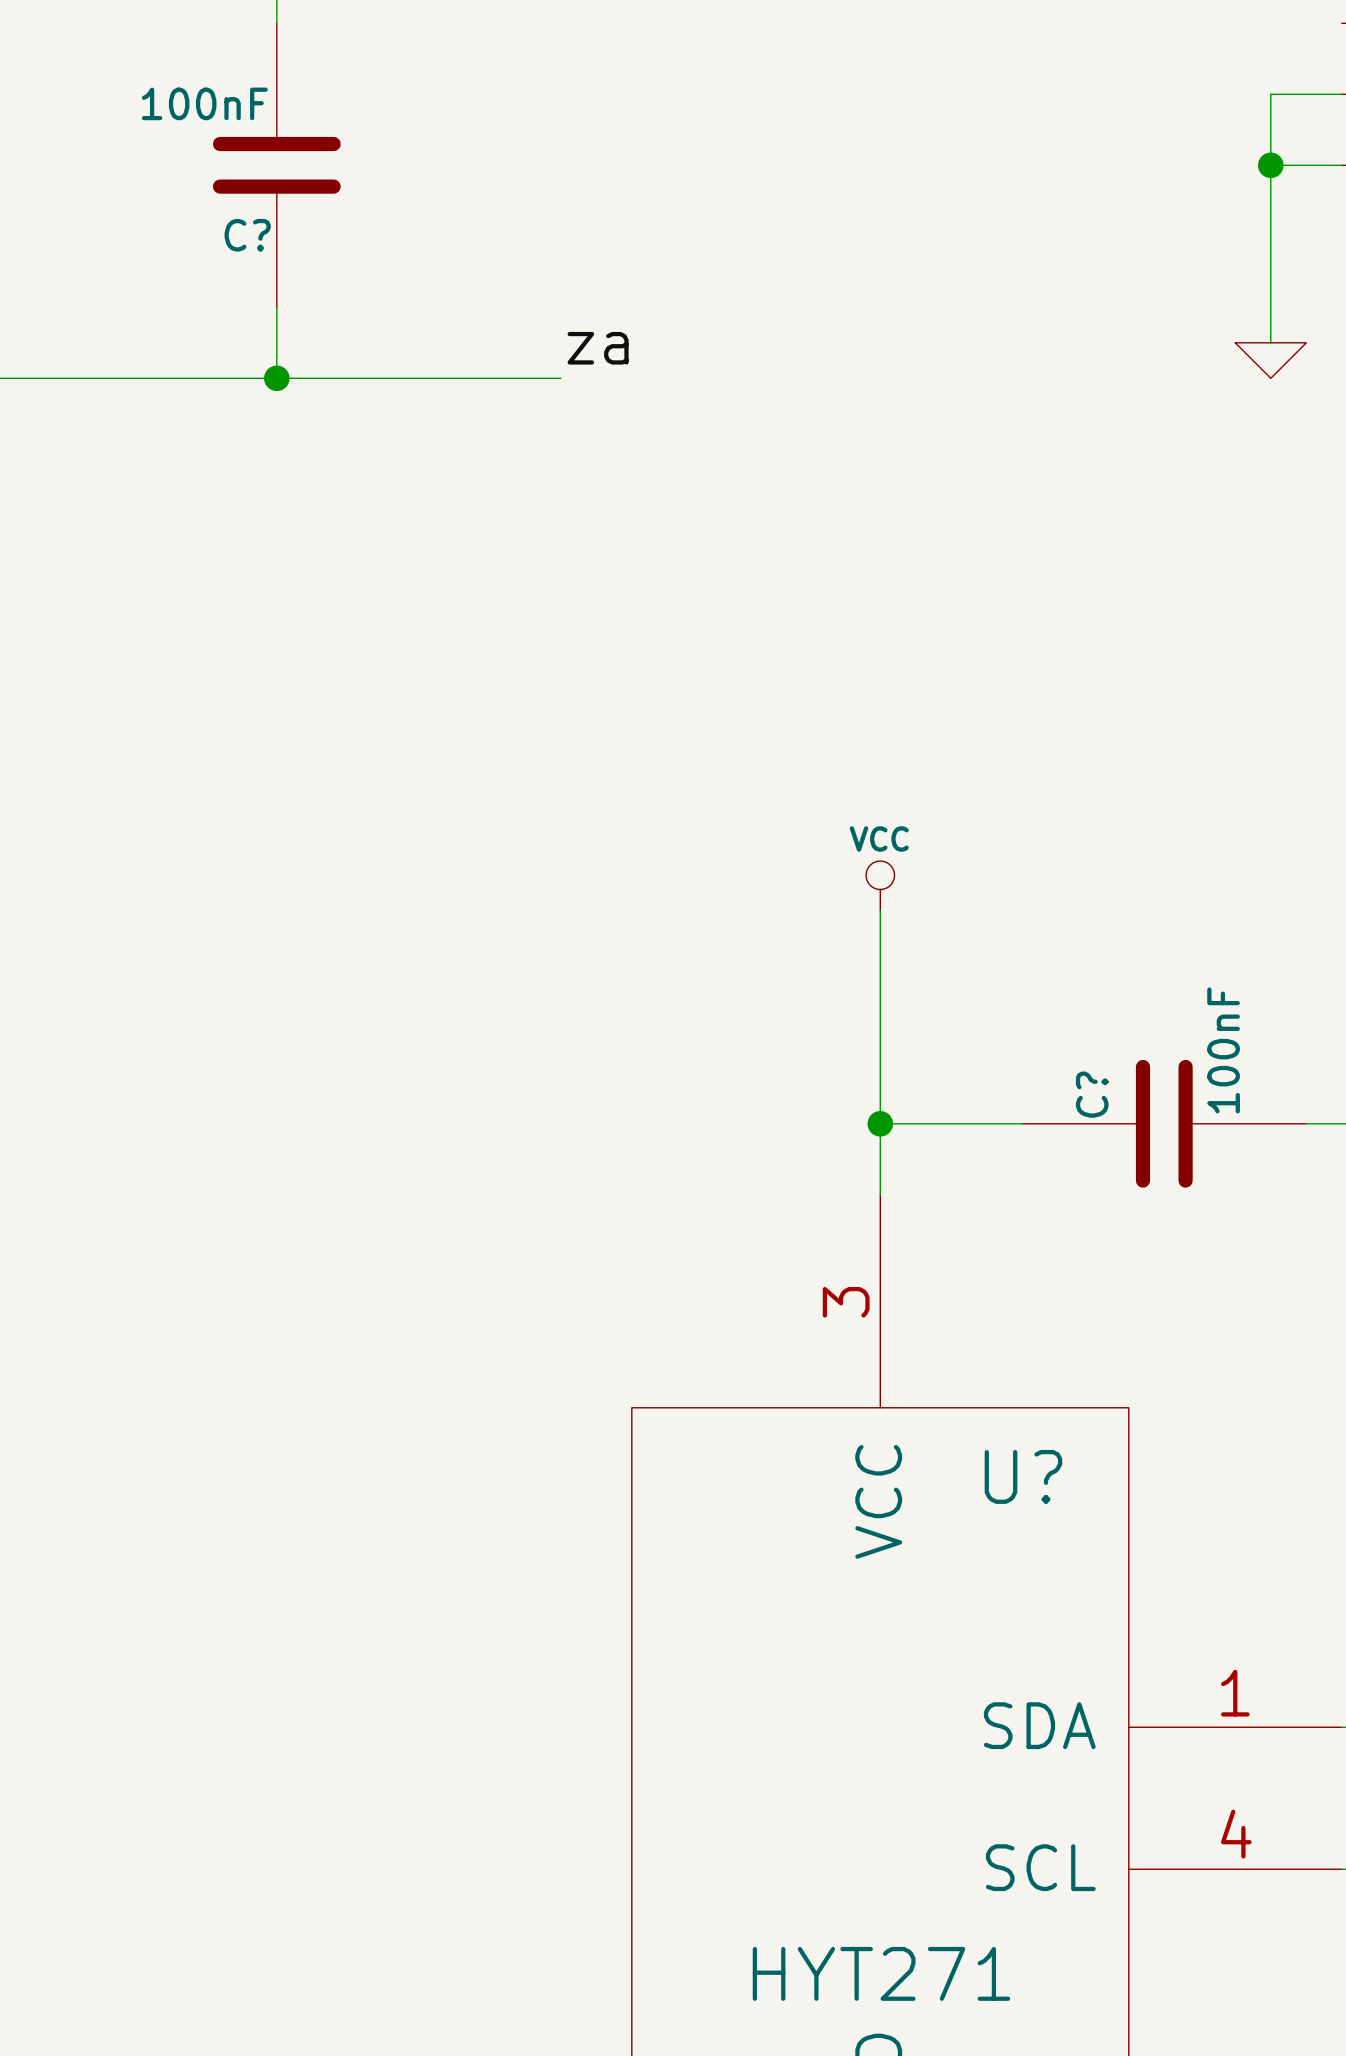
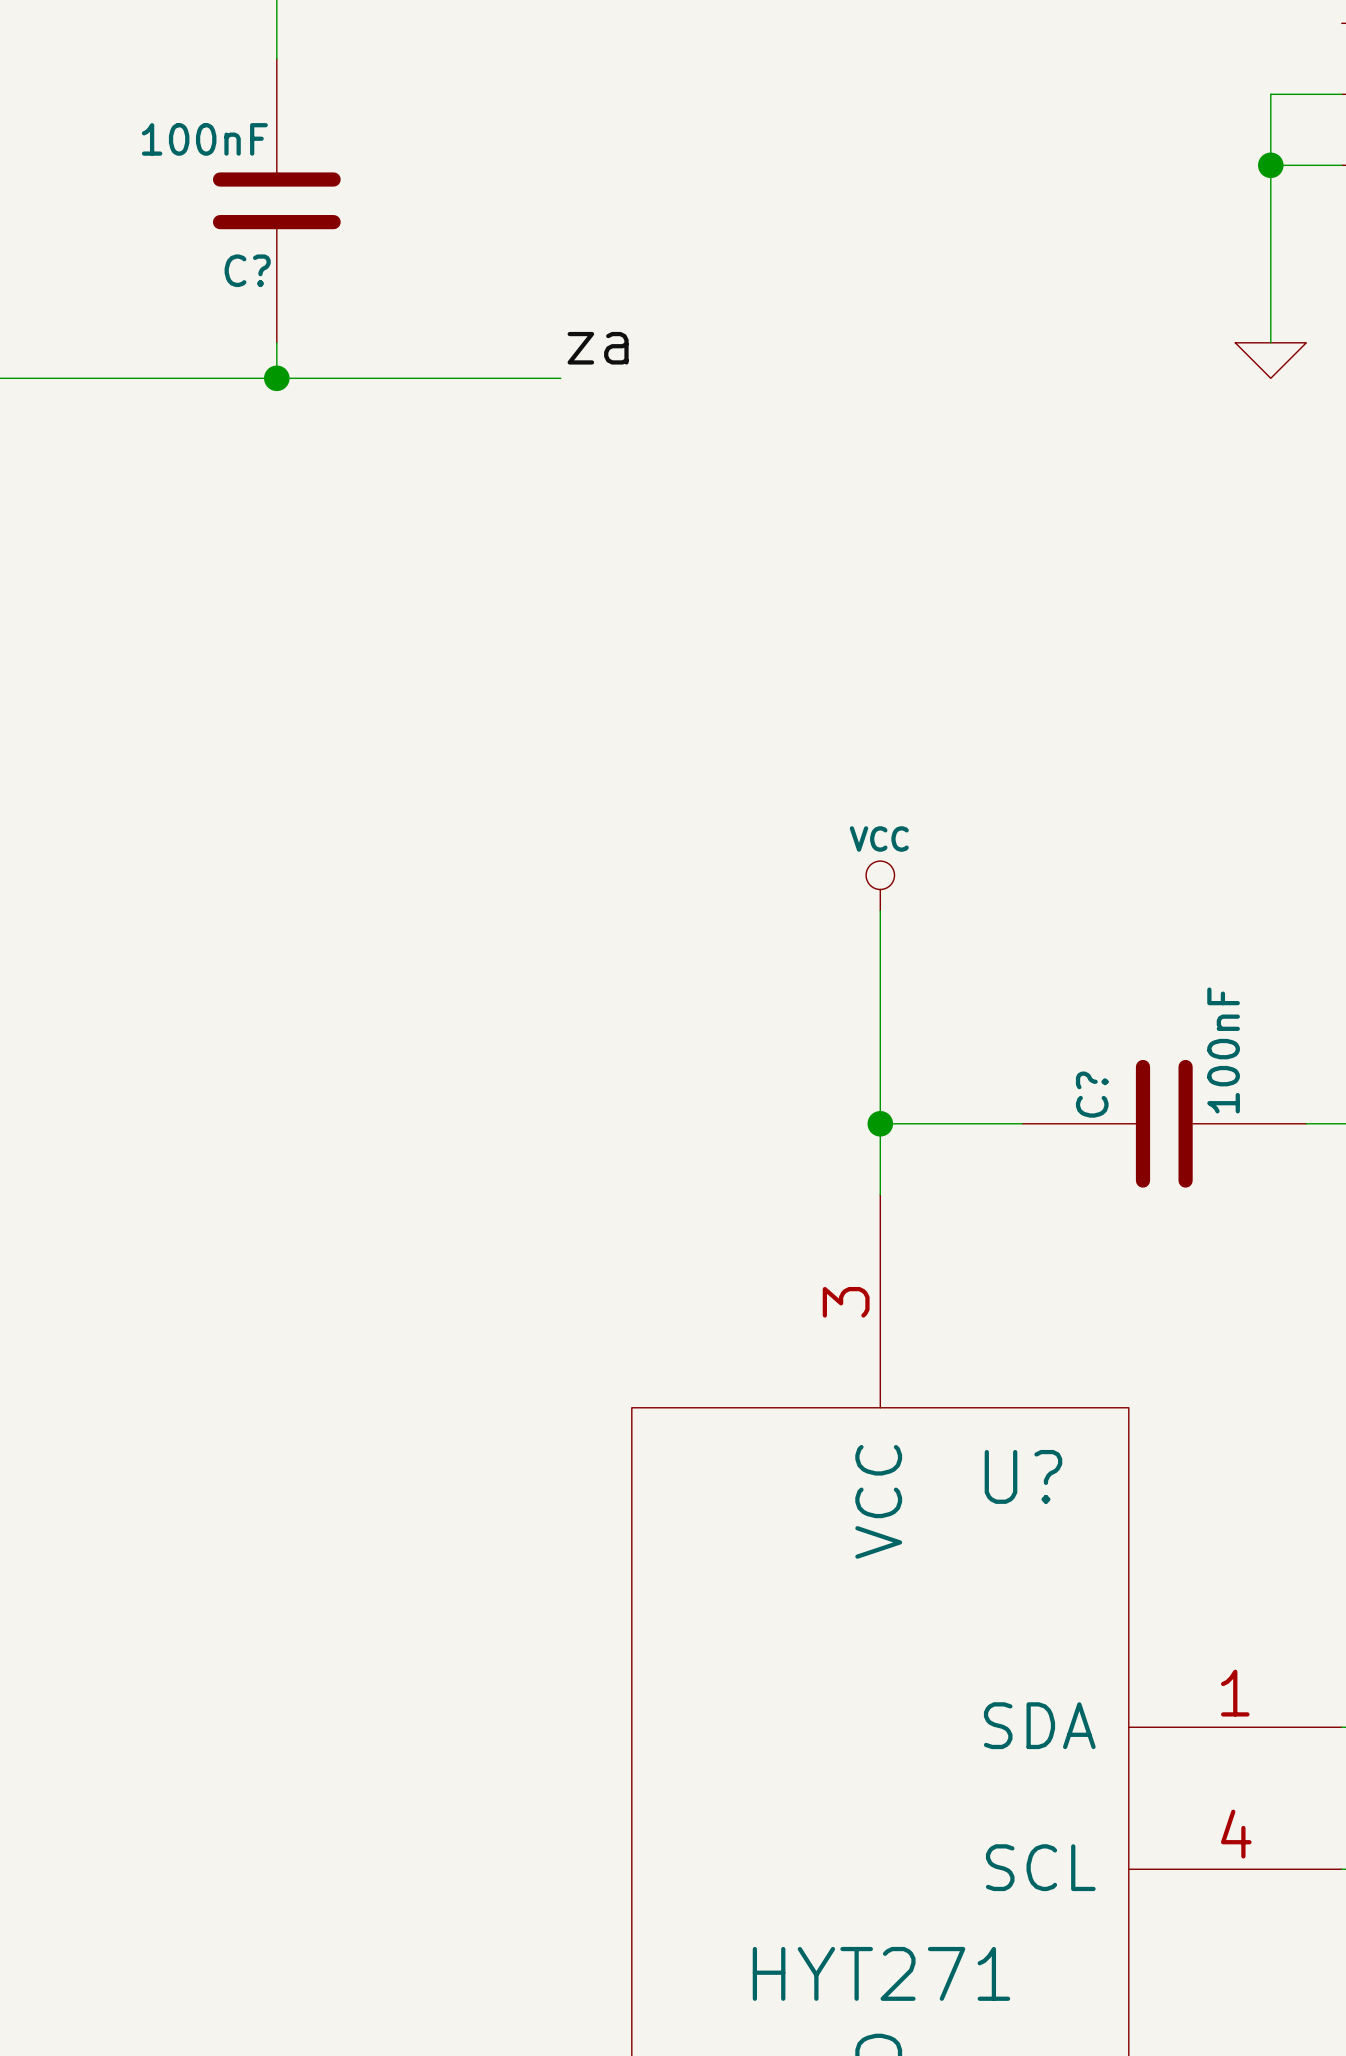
C? position: (276, 165) -> (276, 200)

